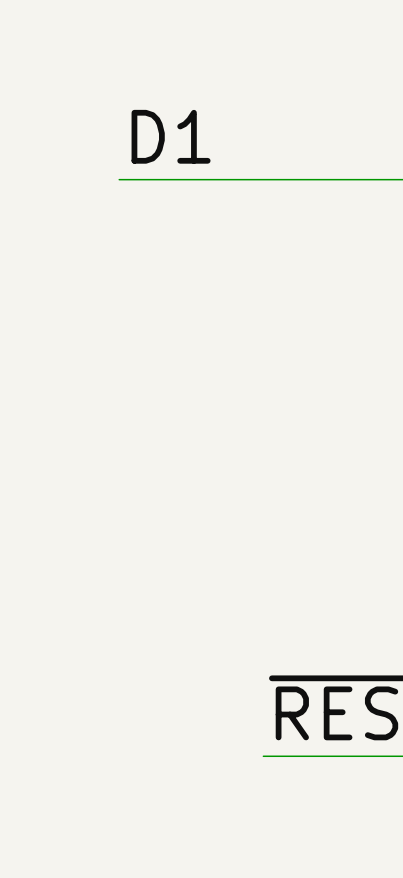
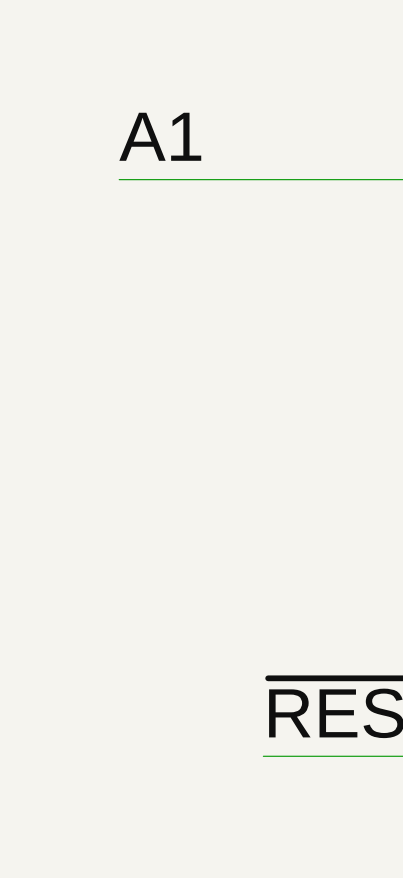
label: D1 (171, 136) -> A1 (160, 136)

